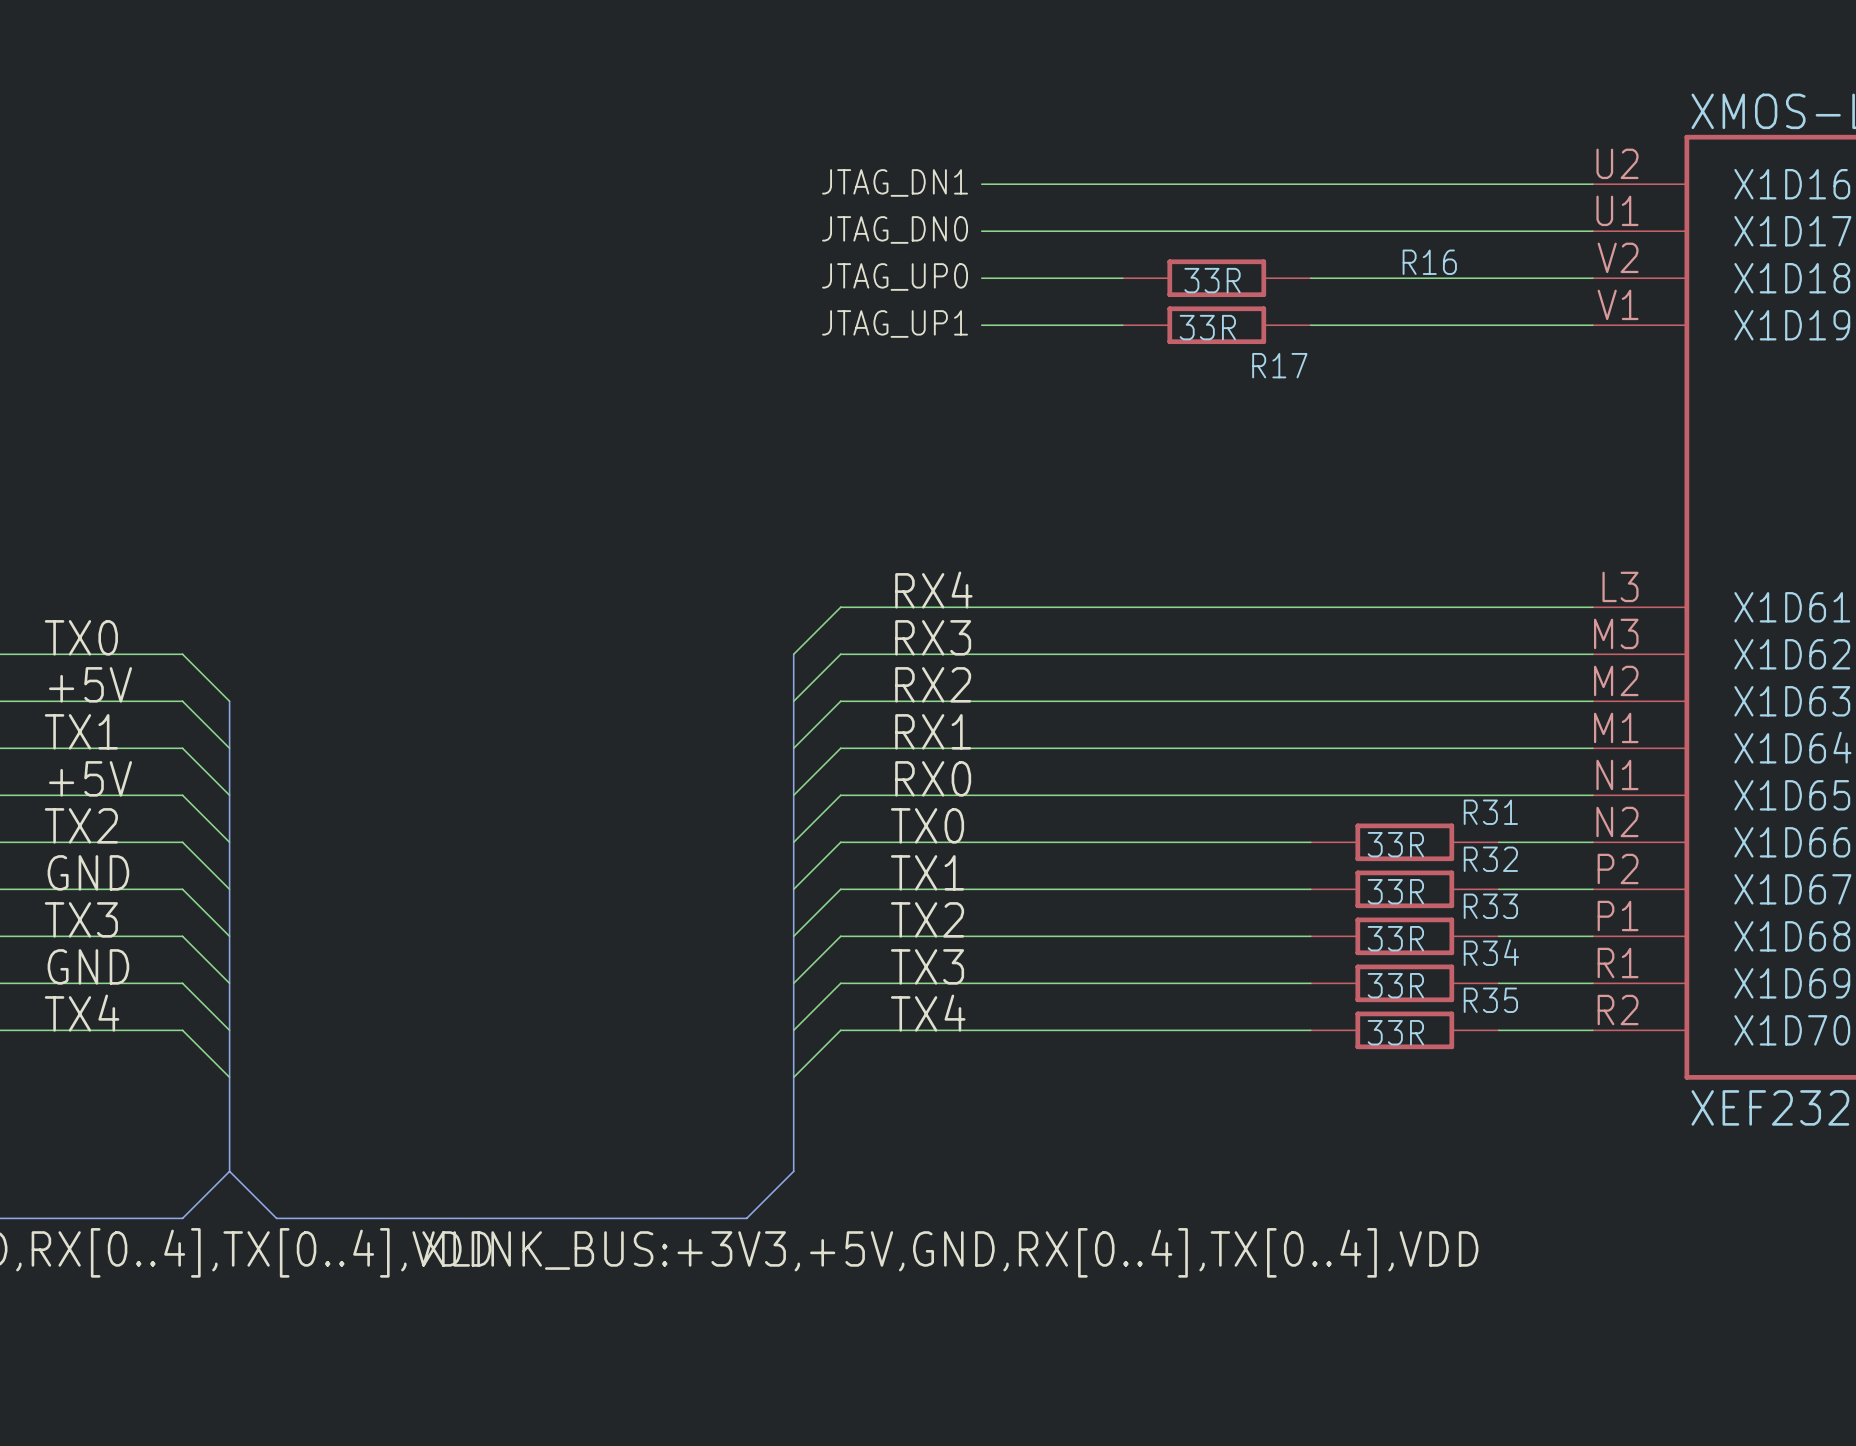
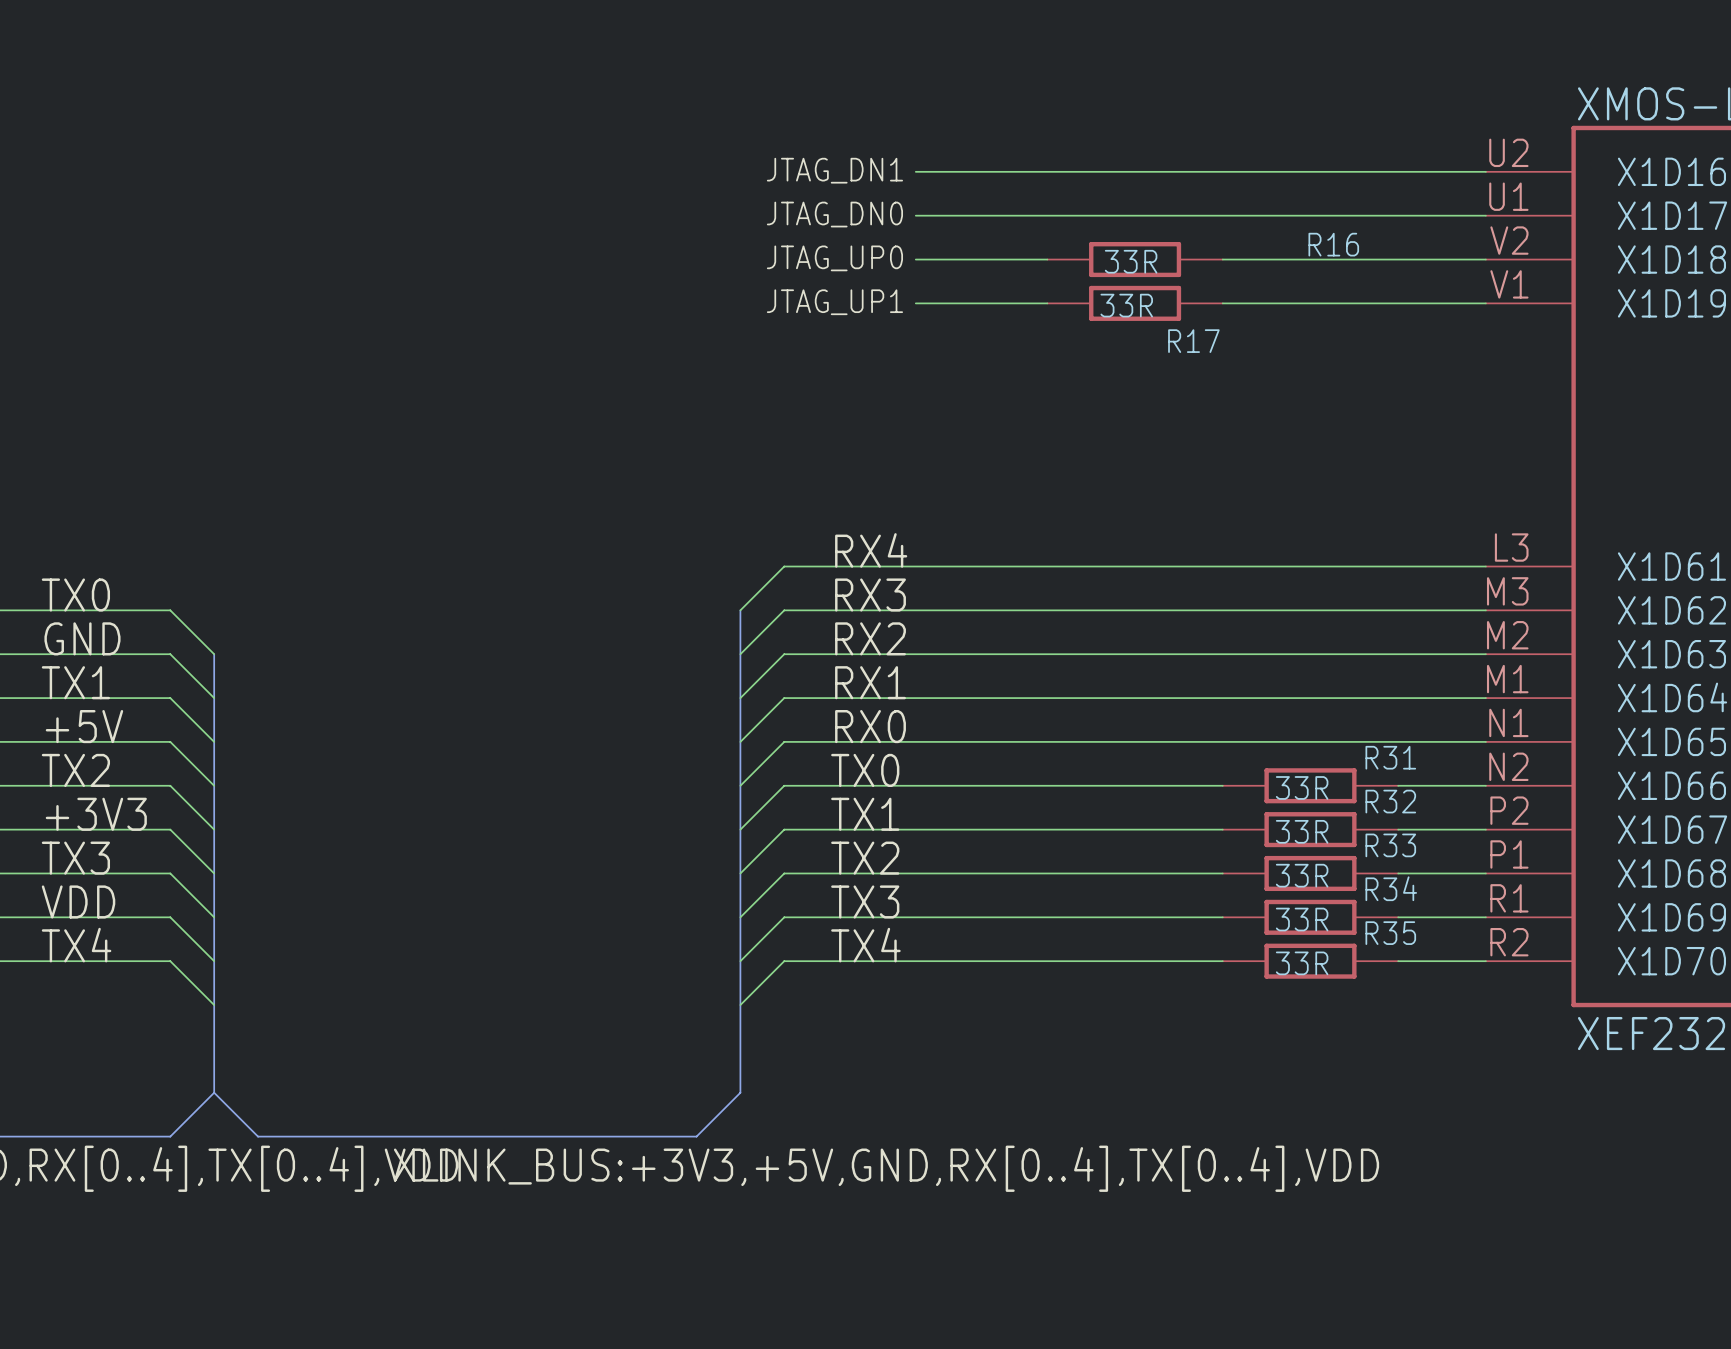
label: +5V (90, 684) -> GND (82, 638)
label: GND (88, 872) -> +3V3 (96, 814)
label: GND (88, 966) -> VDD (78, 901)

